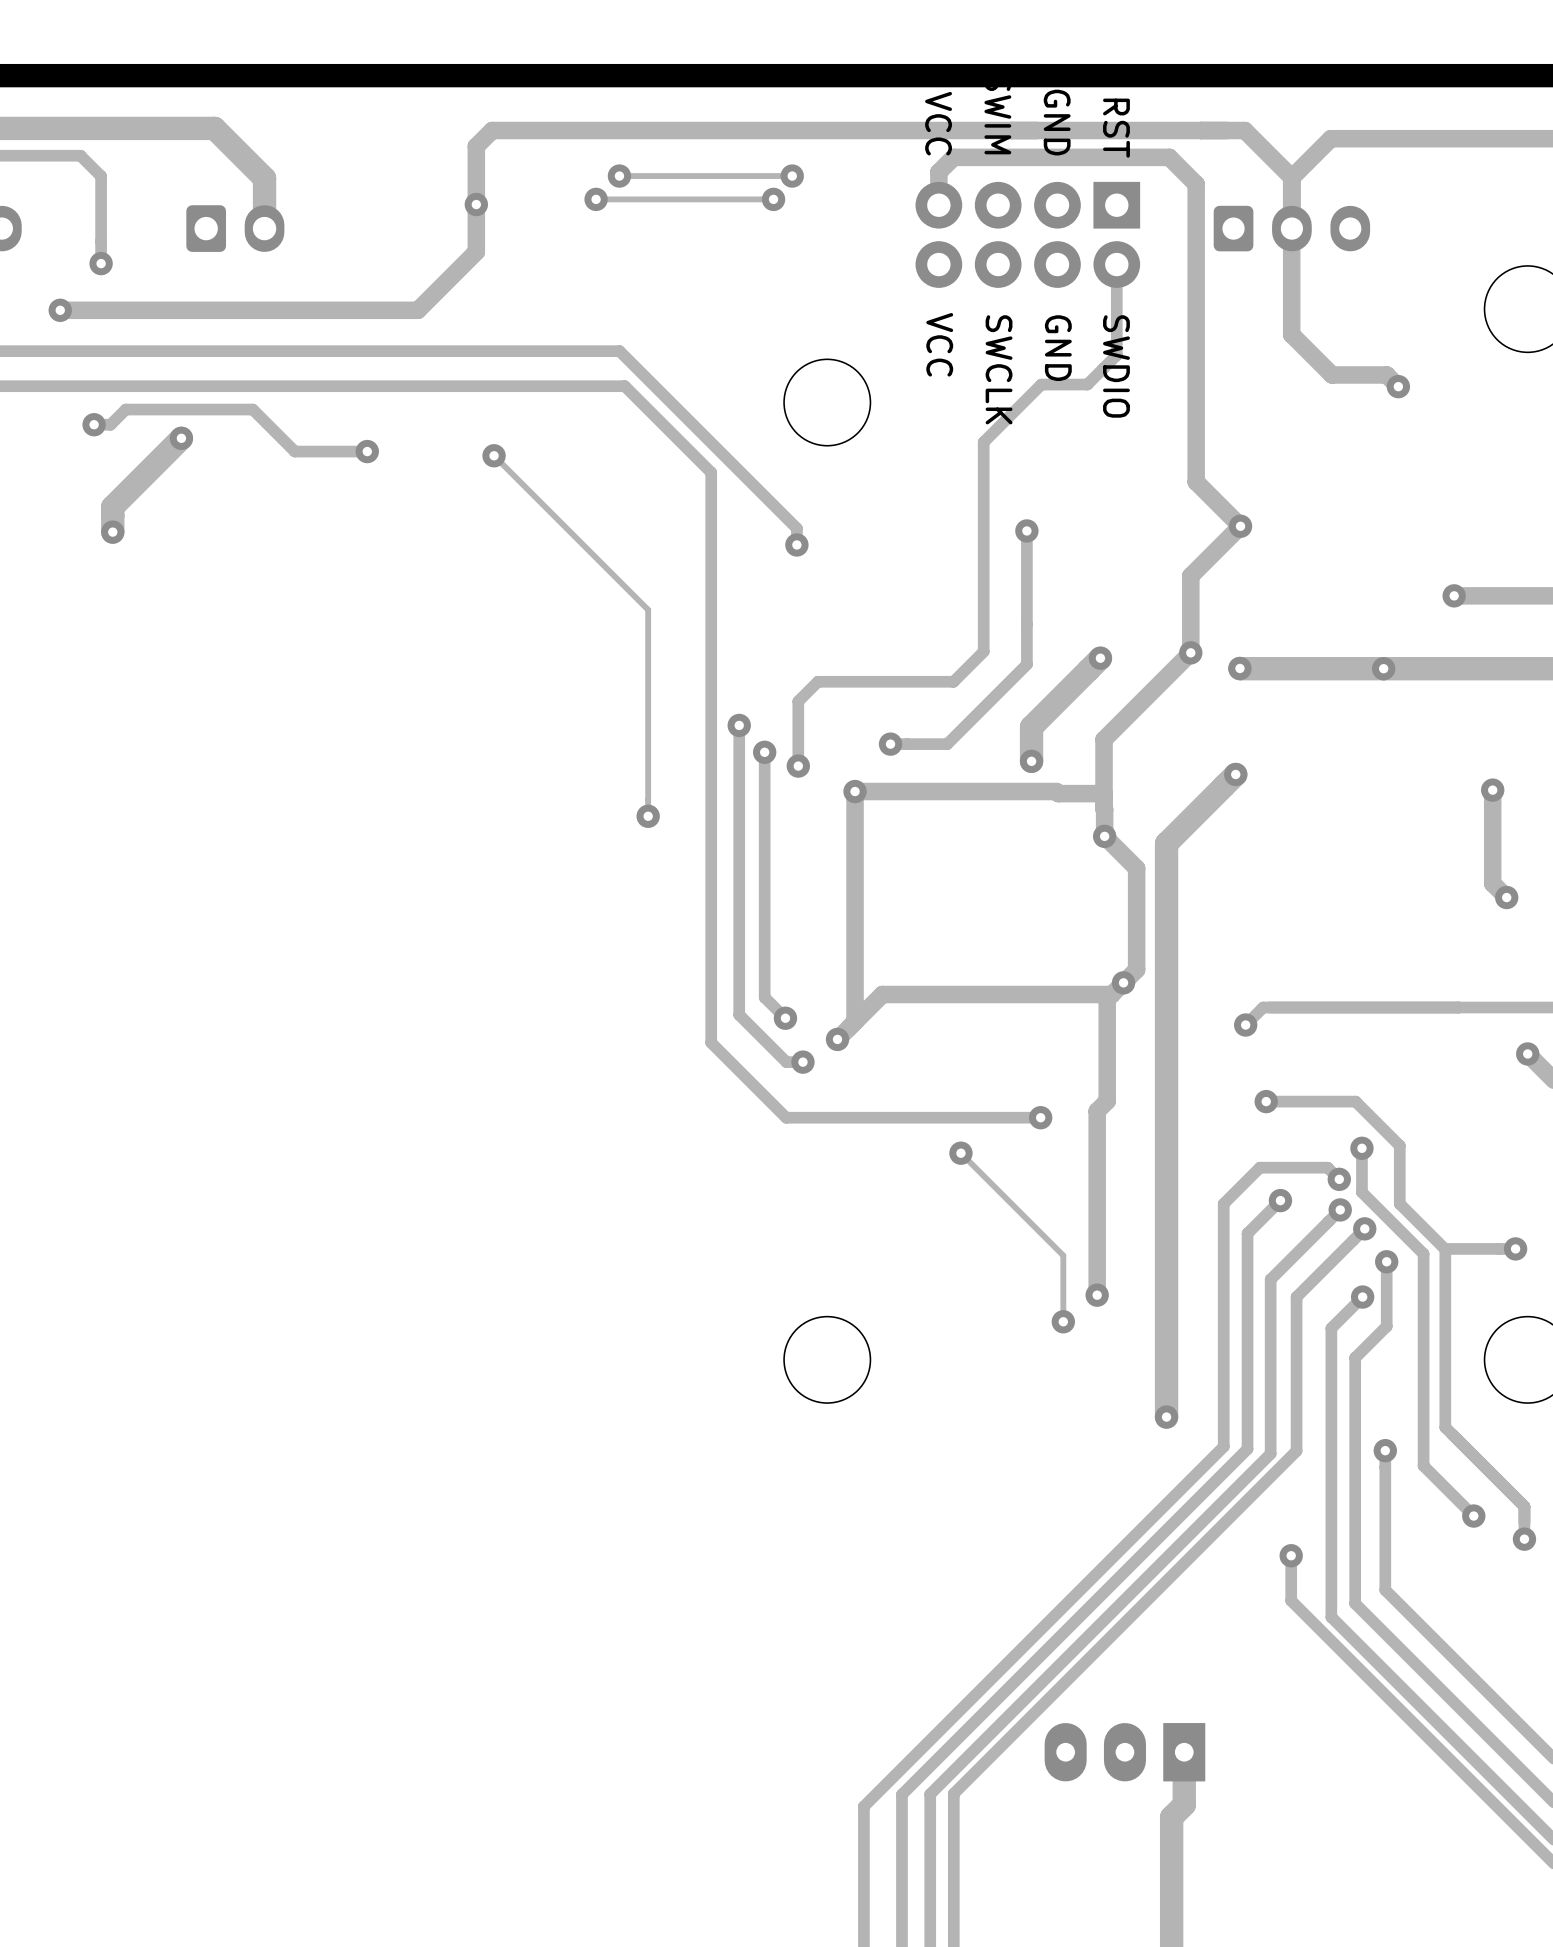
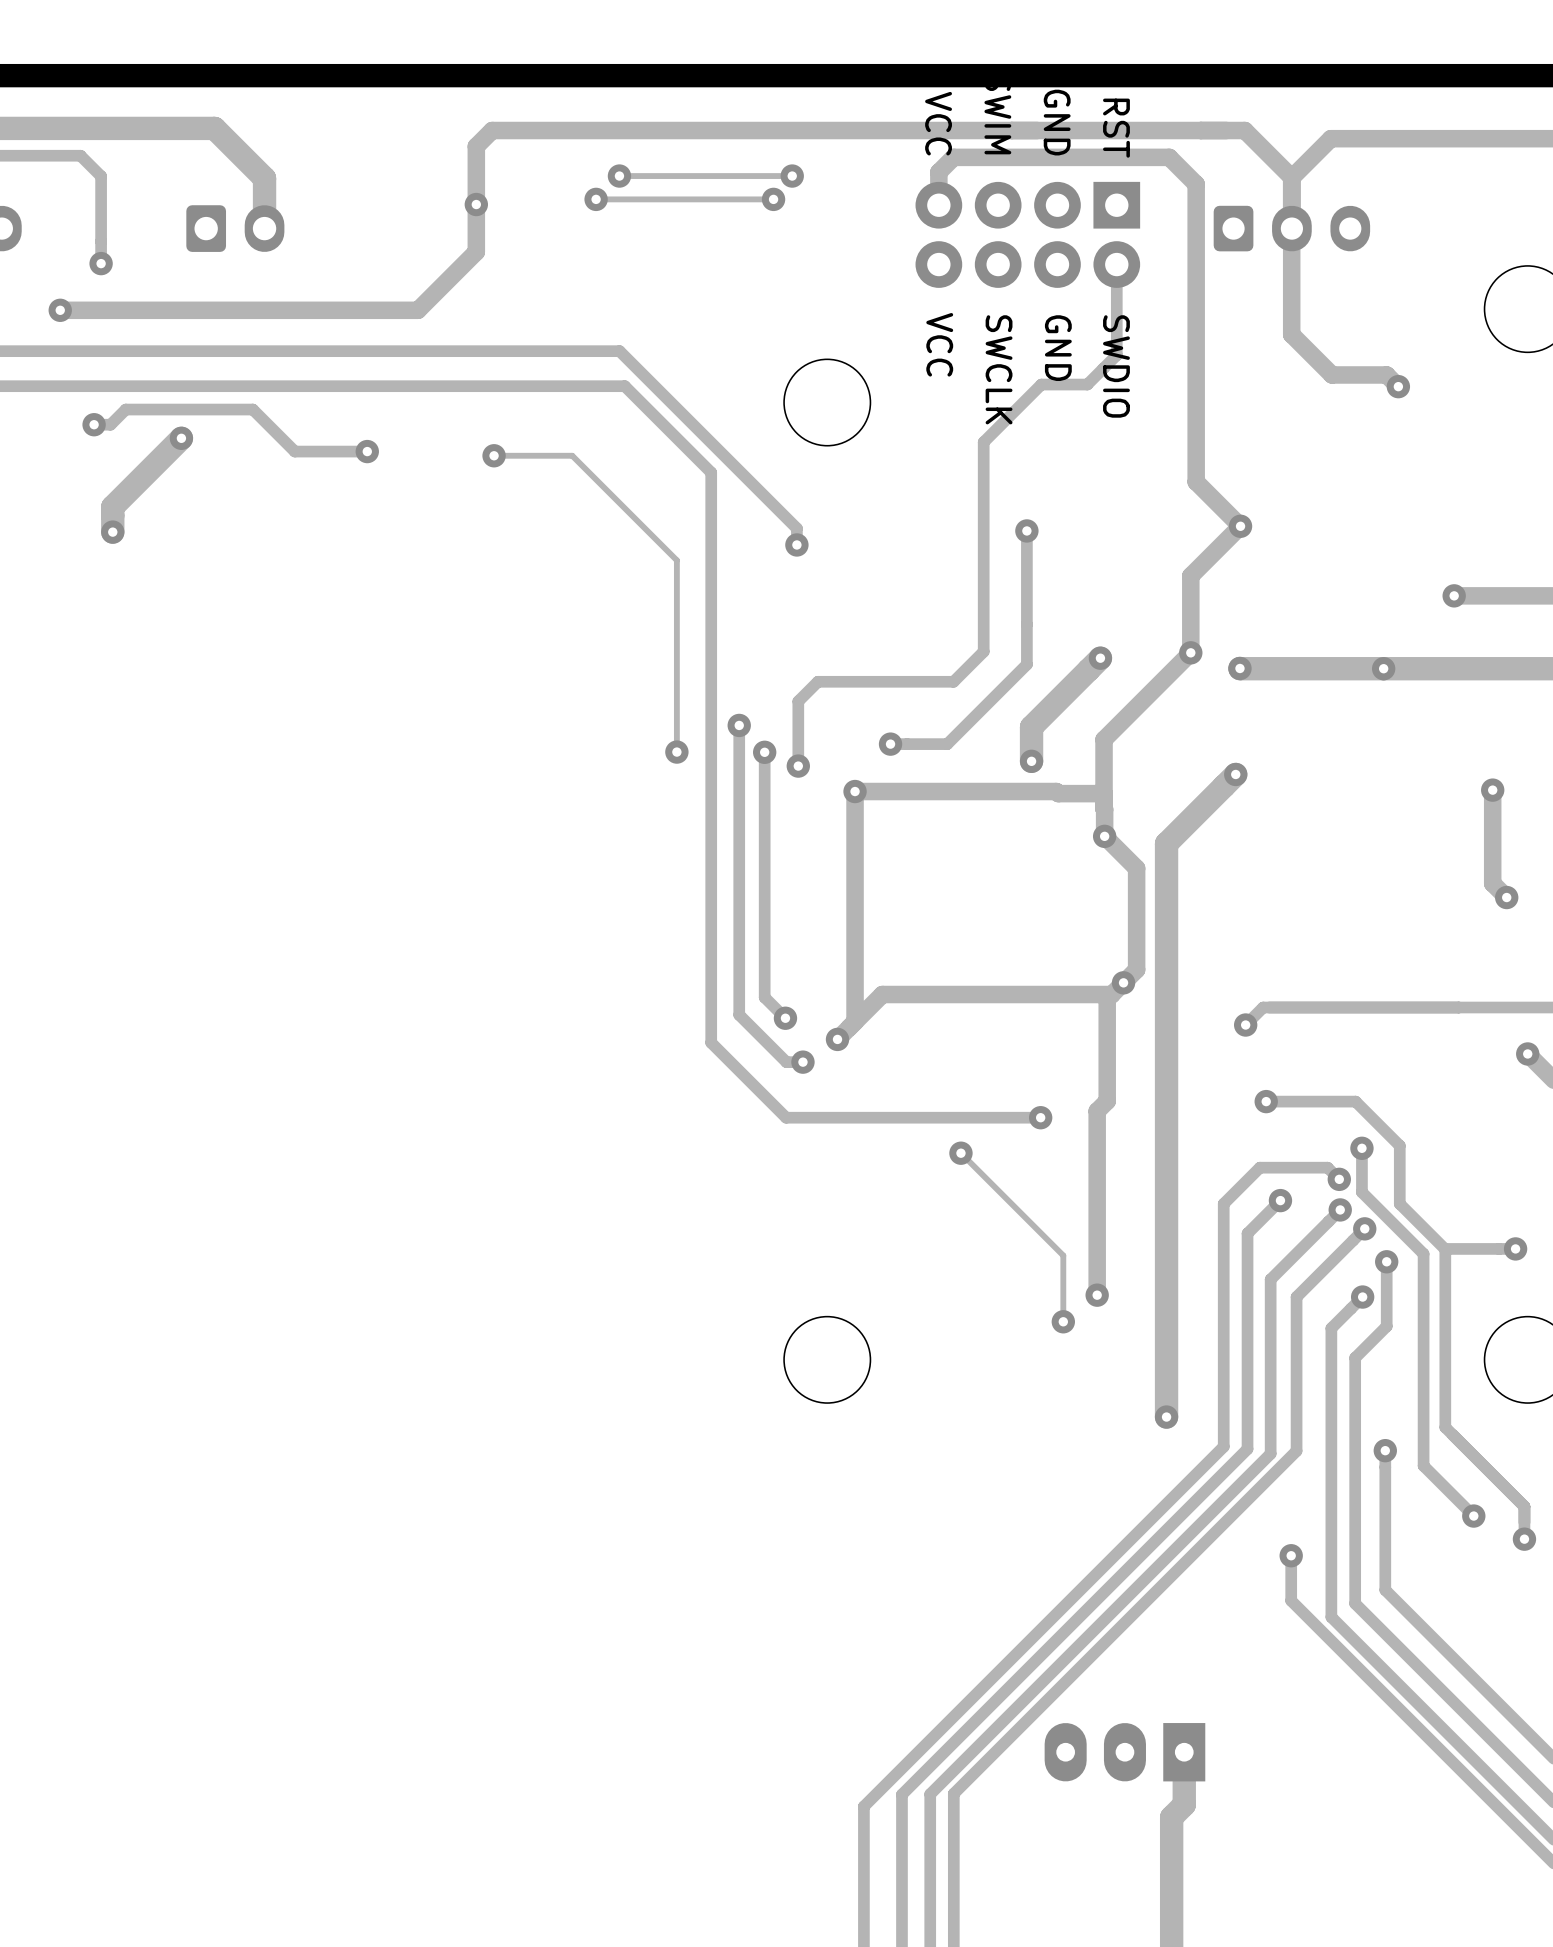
track: (494, 455) (648, 609) (648, 816) -> (494, 455) (572, 455) (676, 560) (676, 752)
via position: (648, 816) -> (676, 752)

